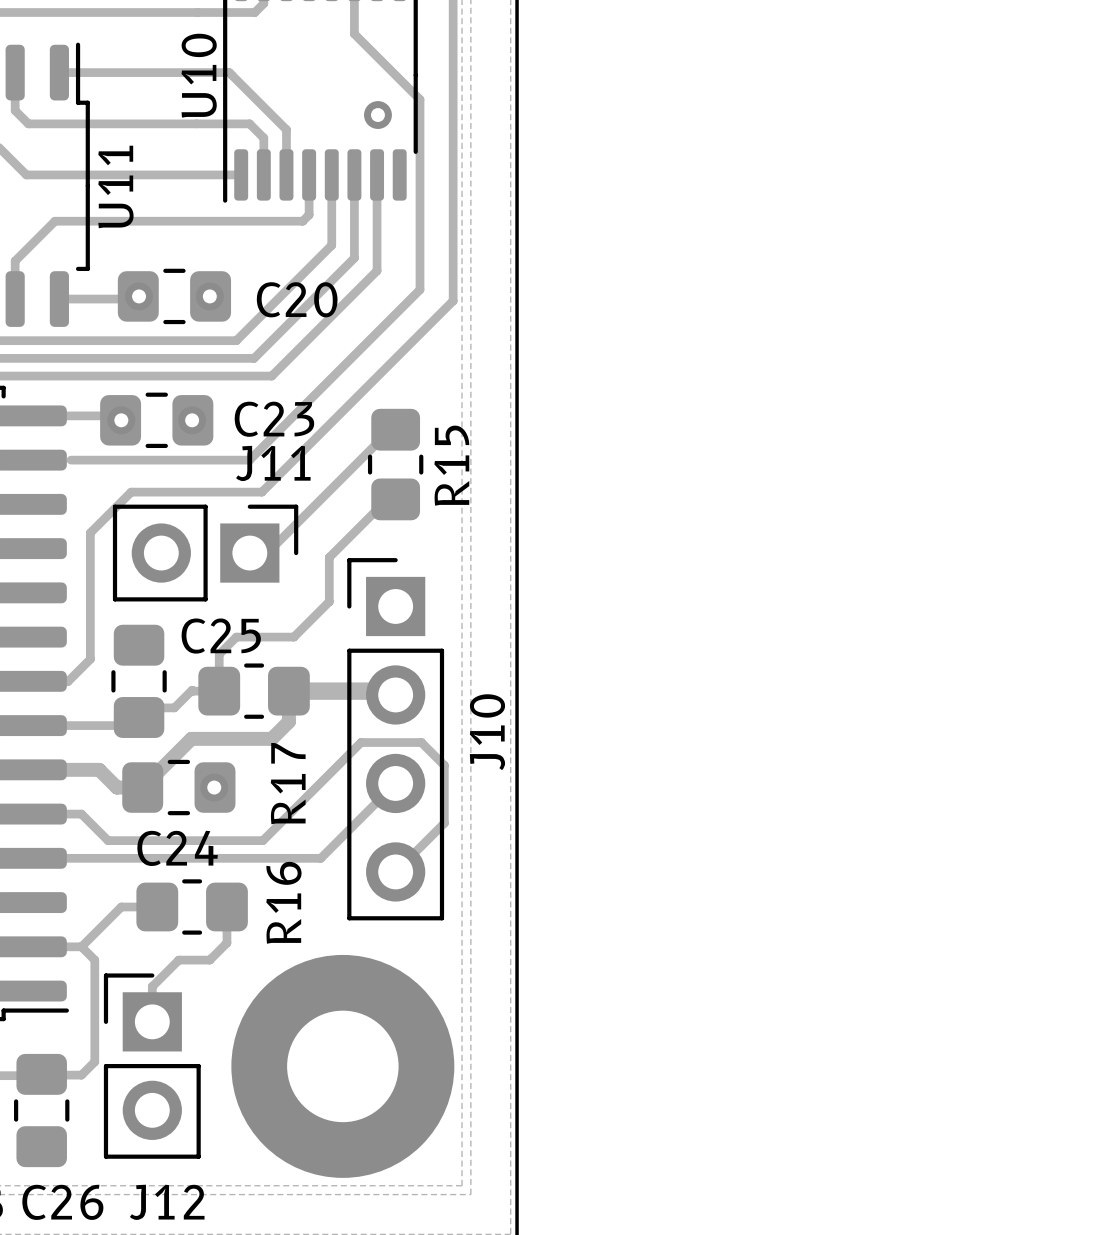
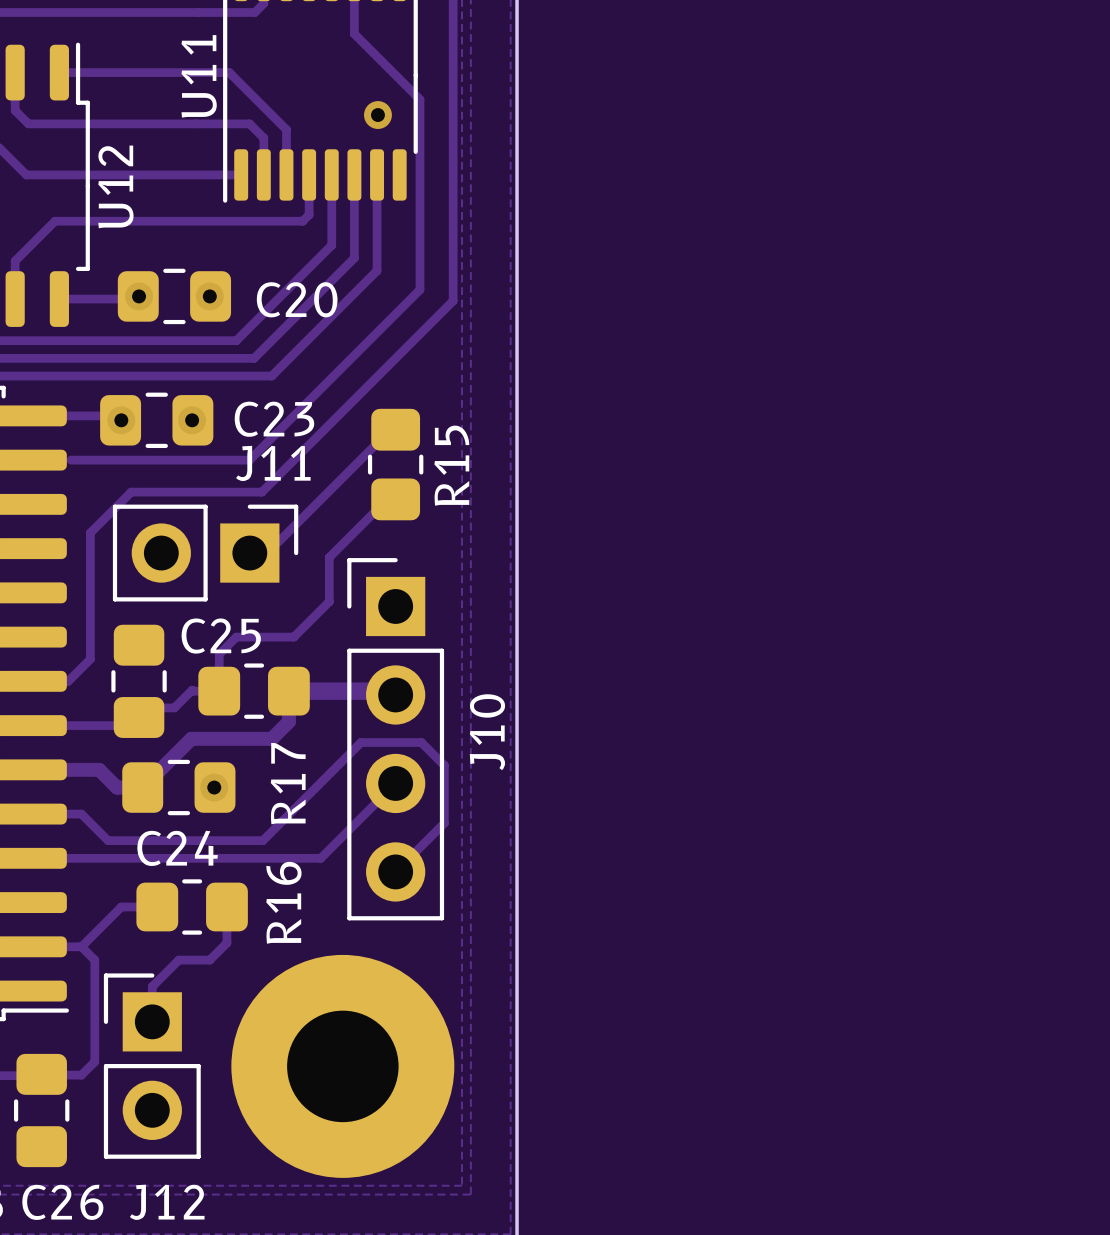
U10 name: U10 (199, 75) -> U11 (199, 76)
U11 name: U11 (115, 186) -> U12 (115, 186)

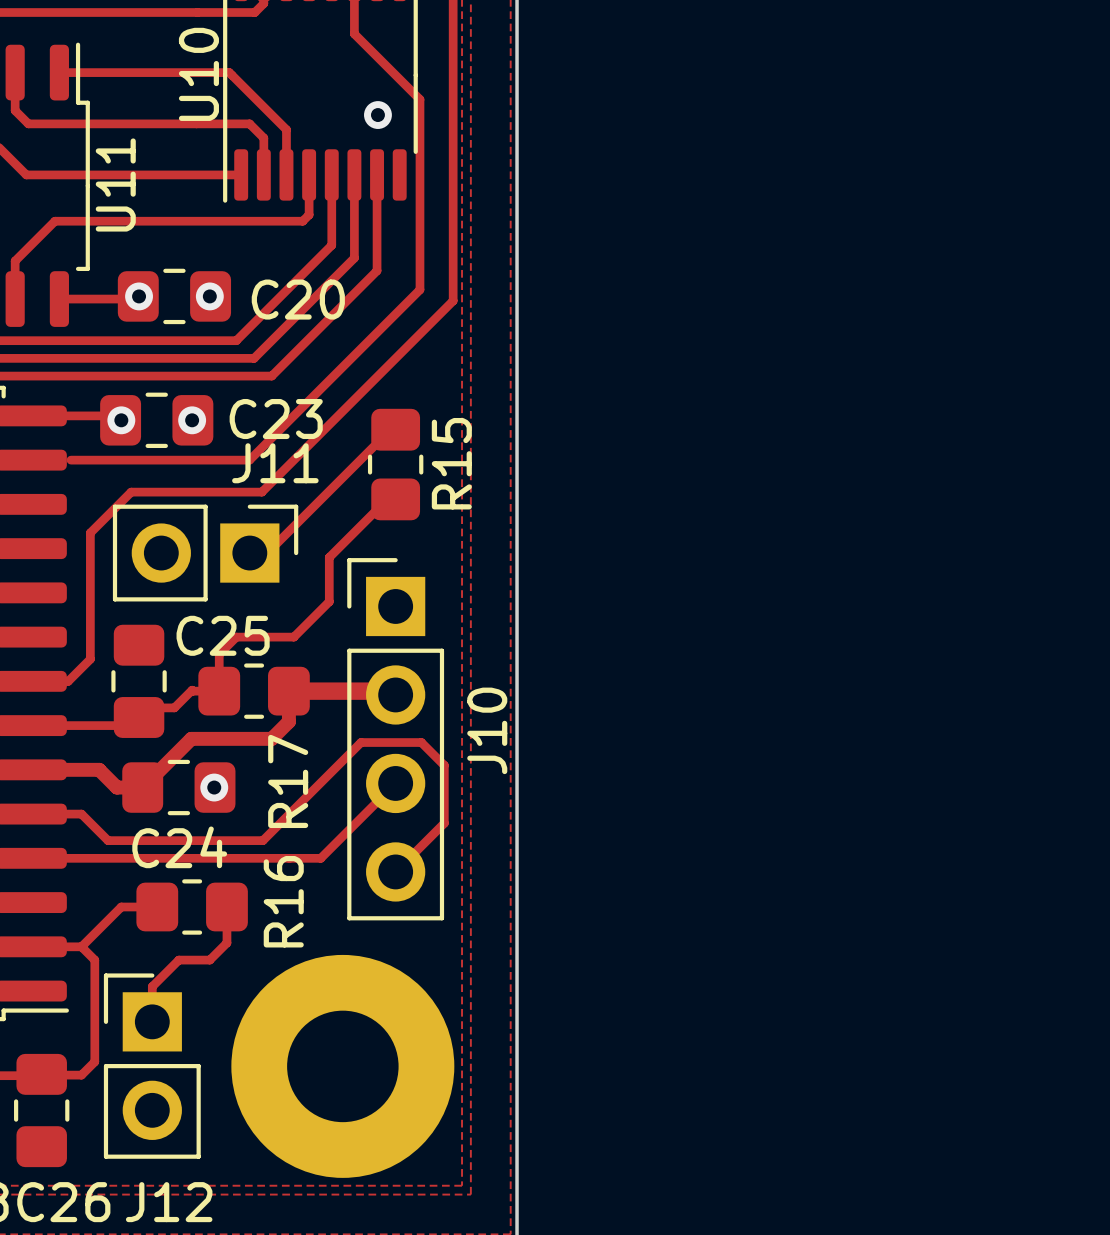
U11 name: U11 (199, 76) -> U10 (198, 74)
U12 name: U12 (115, 186) -> U11 (115, 184)

